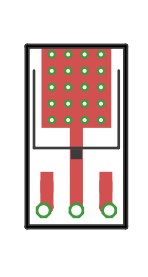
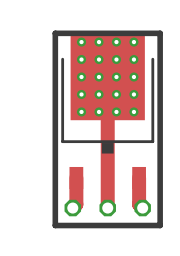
board edge: (27, 46) (125, 46) (125, 226) (27, 226) (27, 46) -> none

